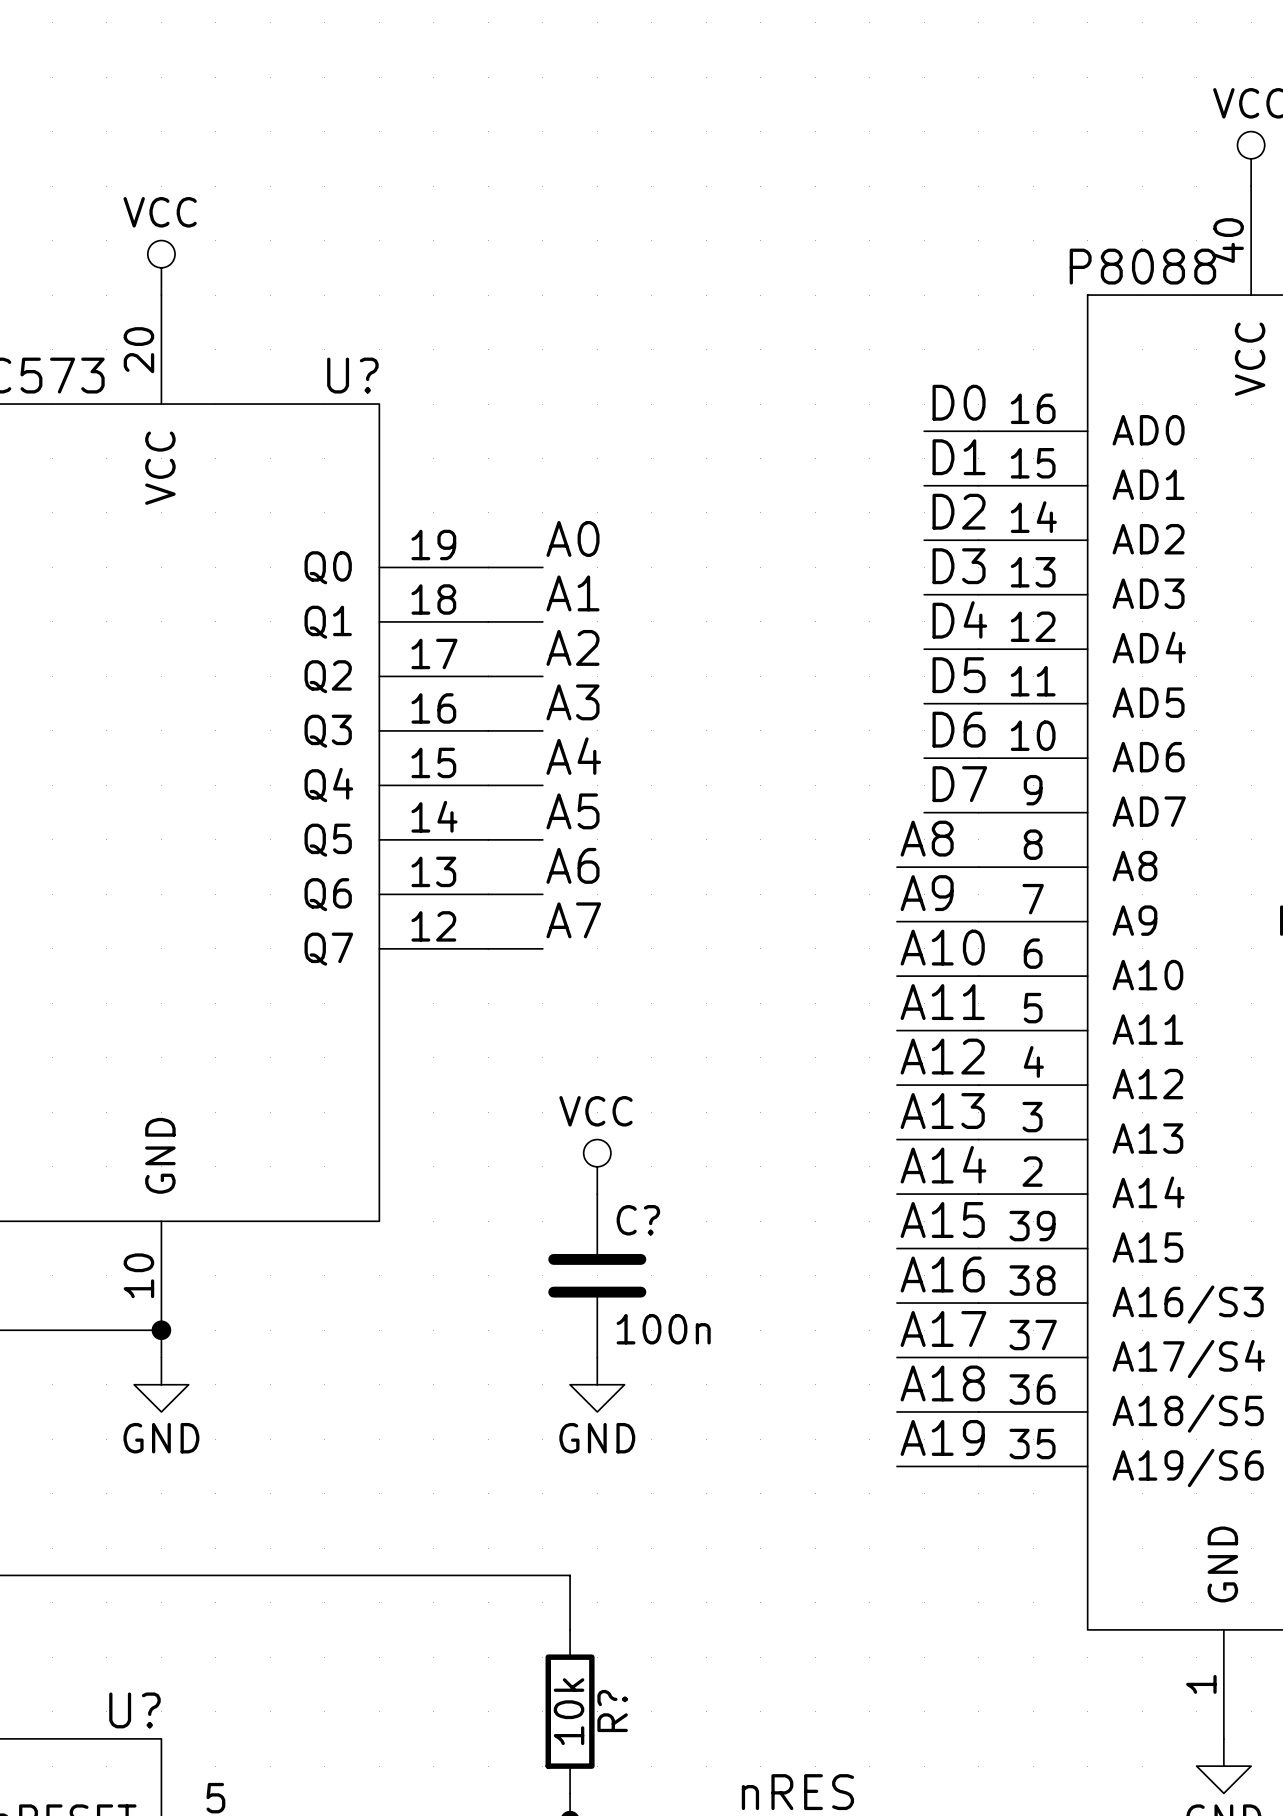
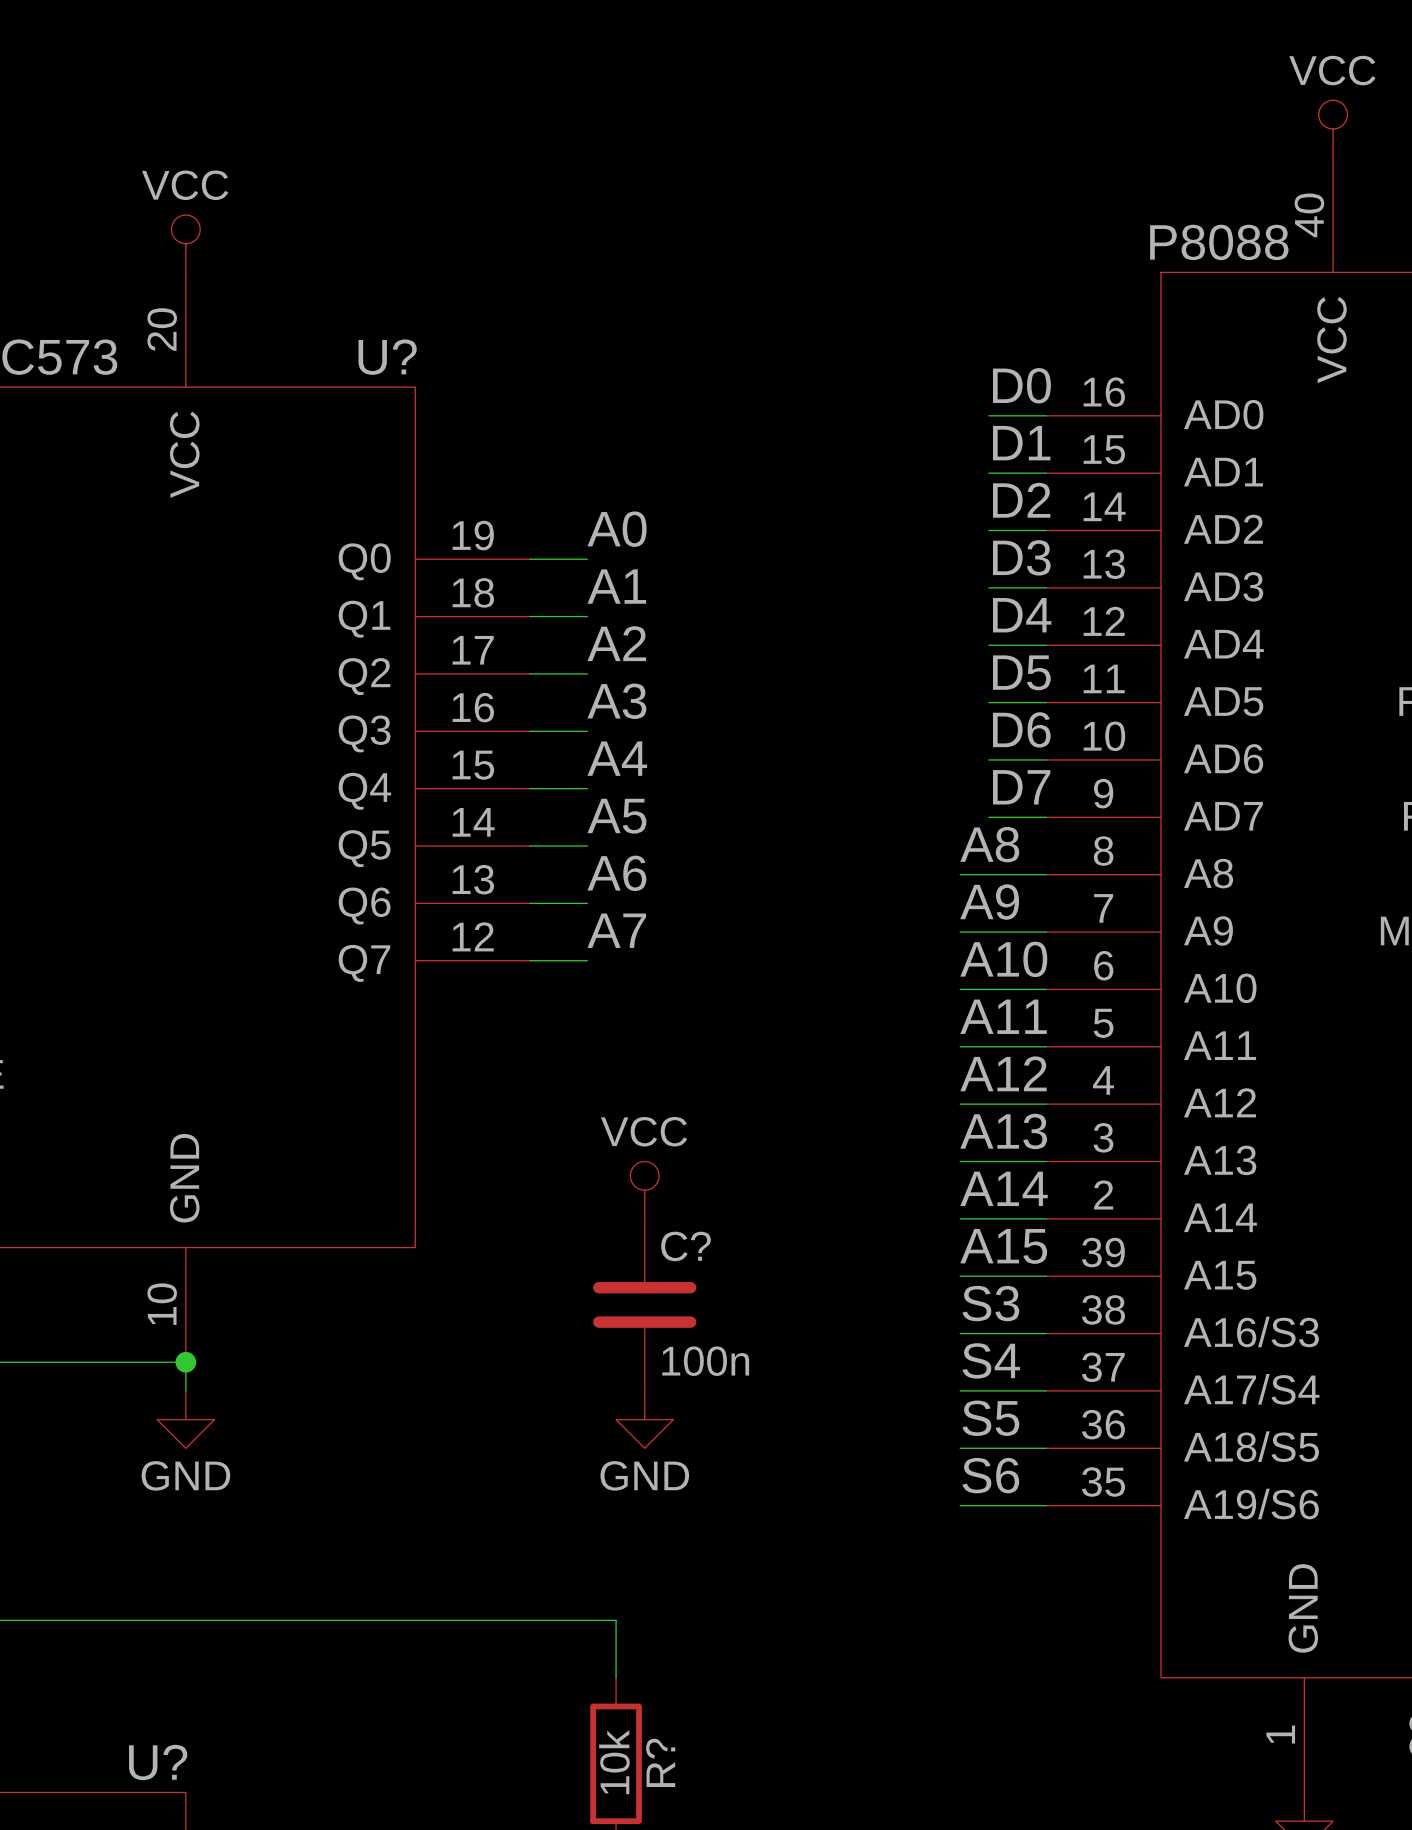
label: A16 (942, 1274) -> S3 (990, 1303)
label: A17 (943, 1328) -> S4 (991, 1360)
label: A18 (942, 1383) -> S5 (990, 1418)
label: A19 (942, 1437) -> S6 (990, 1475)

